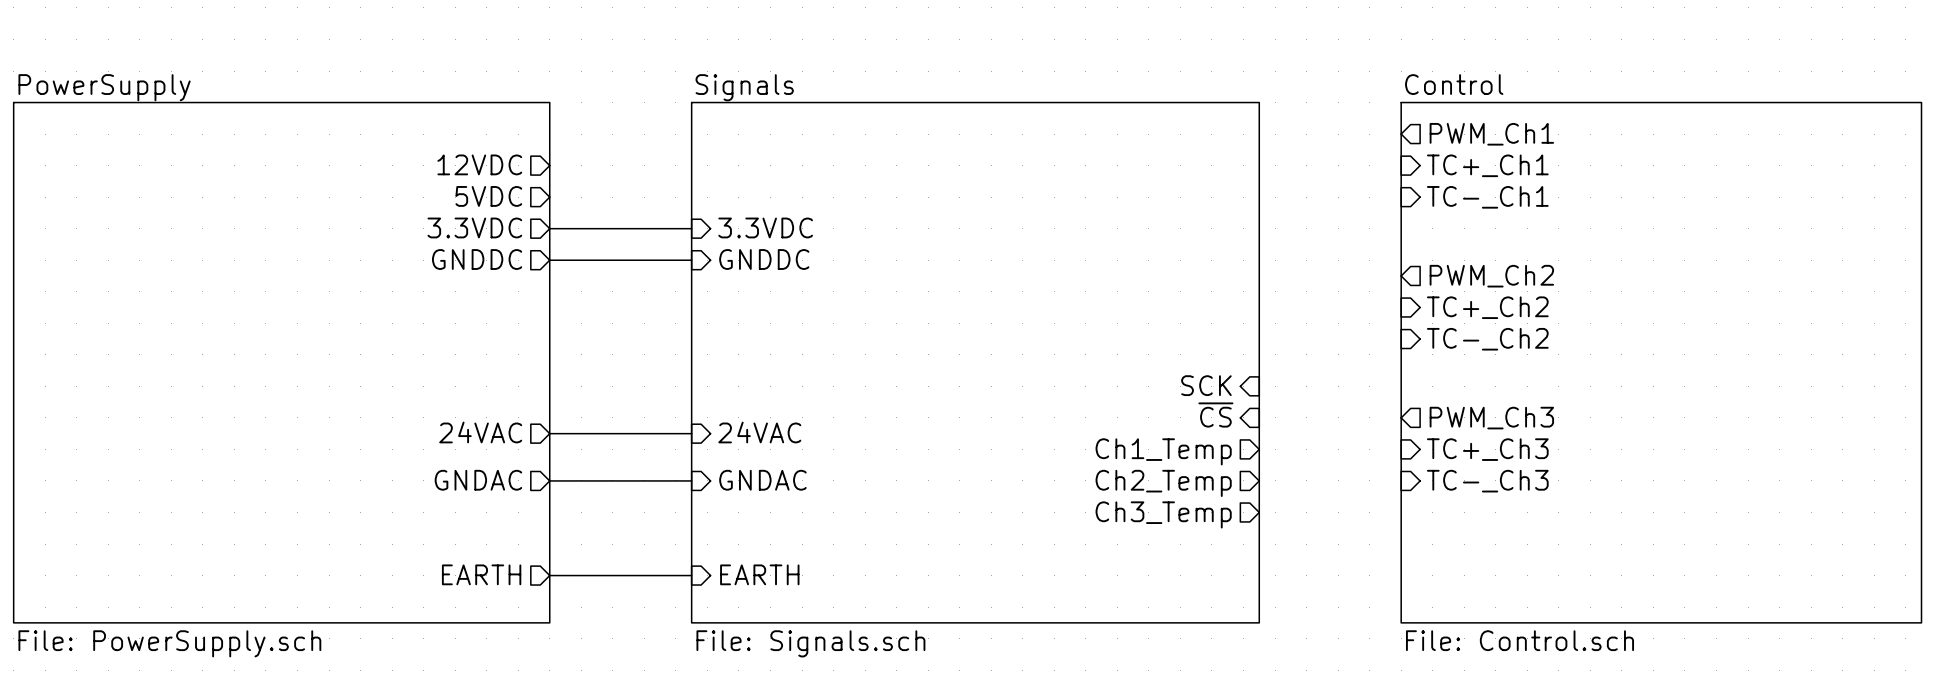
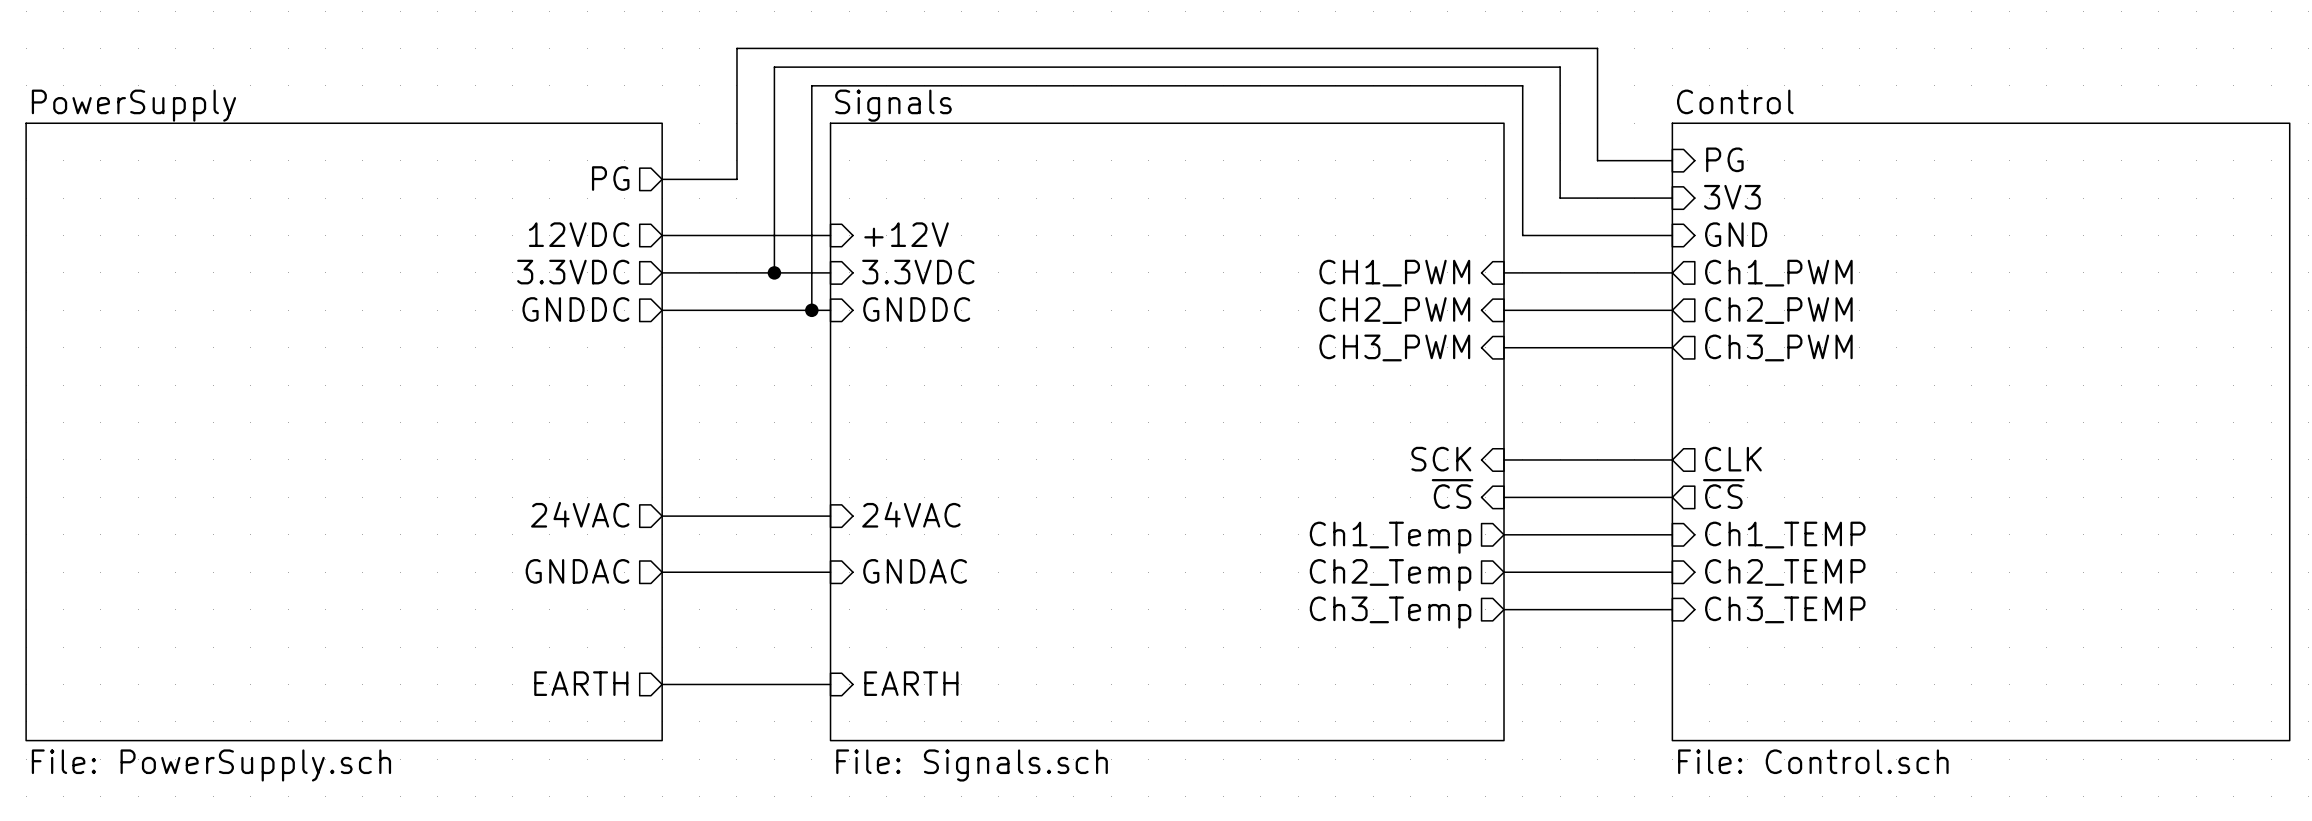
wire: none -> (1672, 160) (1597, 160) (1597, 48) (736, 48) (736, 179) (662, 179)
sheet pin shape: output (1491, 134) -> input (1724, 159)
sheet pin: PWM_Ch1 (1491, 134) -> PG (1724, 159)
sheet pin: none -> PG (610, 178)
sheet pin: 12VDC (479, 164) -> none
wire: none -> (1672, 198) (1560, 198) (1560, 67) (774, 67) (774, 272)
sheet pin: TC+_Ch1 (1487, 165) -> 3V3 (1732, 197)
sheet pin: 5VDC (488, 196) -> 12VDC (579, 234)
sheet pin: none -> +12V (906, 234)
wire: none -> (662, 235) (830, 235)
wire: none -> (1672, 235) (1522, 235) (1522, 85) (811, 85) (811, 310)
sheet pin: TC-_Ch1 (1487, 197) -> GND (1736, 234)
junction: none -> (774, 272)
sheet pin: none -> CH1_PWM (1394, 273)
wire: none -> (1504, 272) (1672, 272)
sheet pin: none -> Ch1_PWM (1778, 273)
junction: none -> (811, 310)
sheet pin: none -> CH2_PWM (1394, 310)
wire: none -> (1504, 310) (1672, 310)
sheet pin: none -> Ch2_PWM (1778, 310)
sheet pin: PWM_Ch2 (1491, 276) -> none
sheet pin: none -> CH3_PWM (1394, 347)
wire: none -> (1504, 347) (1672, 347)
sheet pin: none -> Ch3_PWM (1778, 347)
sheet pin: TC+_Ch2 (1487, 307) -> none
sheet pin: TC-_Ch2 (1487, 339) -> none
sheet pin: none -> CLK (1733, 459)
wire: none -> (1504, 459) (1672, 459)
wire: none -> (1504, 497) (1672, 497)
sheet pin: PWM_Ch3 (1491, 418) -> ~{CS} (1723, 493)
wire: none -> (1504, 534) (1672, 534)
sheet pin: TC+_Ch3 (1487, 449) -> Ch1_TEMP (1785, 535)
wire: none -> (1504, 572) (1672, 572)
sheet pin: TC-_Ch3 (1487, 481) -> Ch2_TEMP (1785, 572)
wire: none -> (1504, 609) (1672, 609)
sheet pin: none -> Ch3_TEMP (1785, 609)

